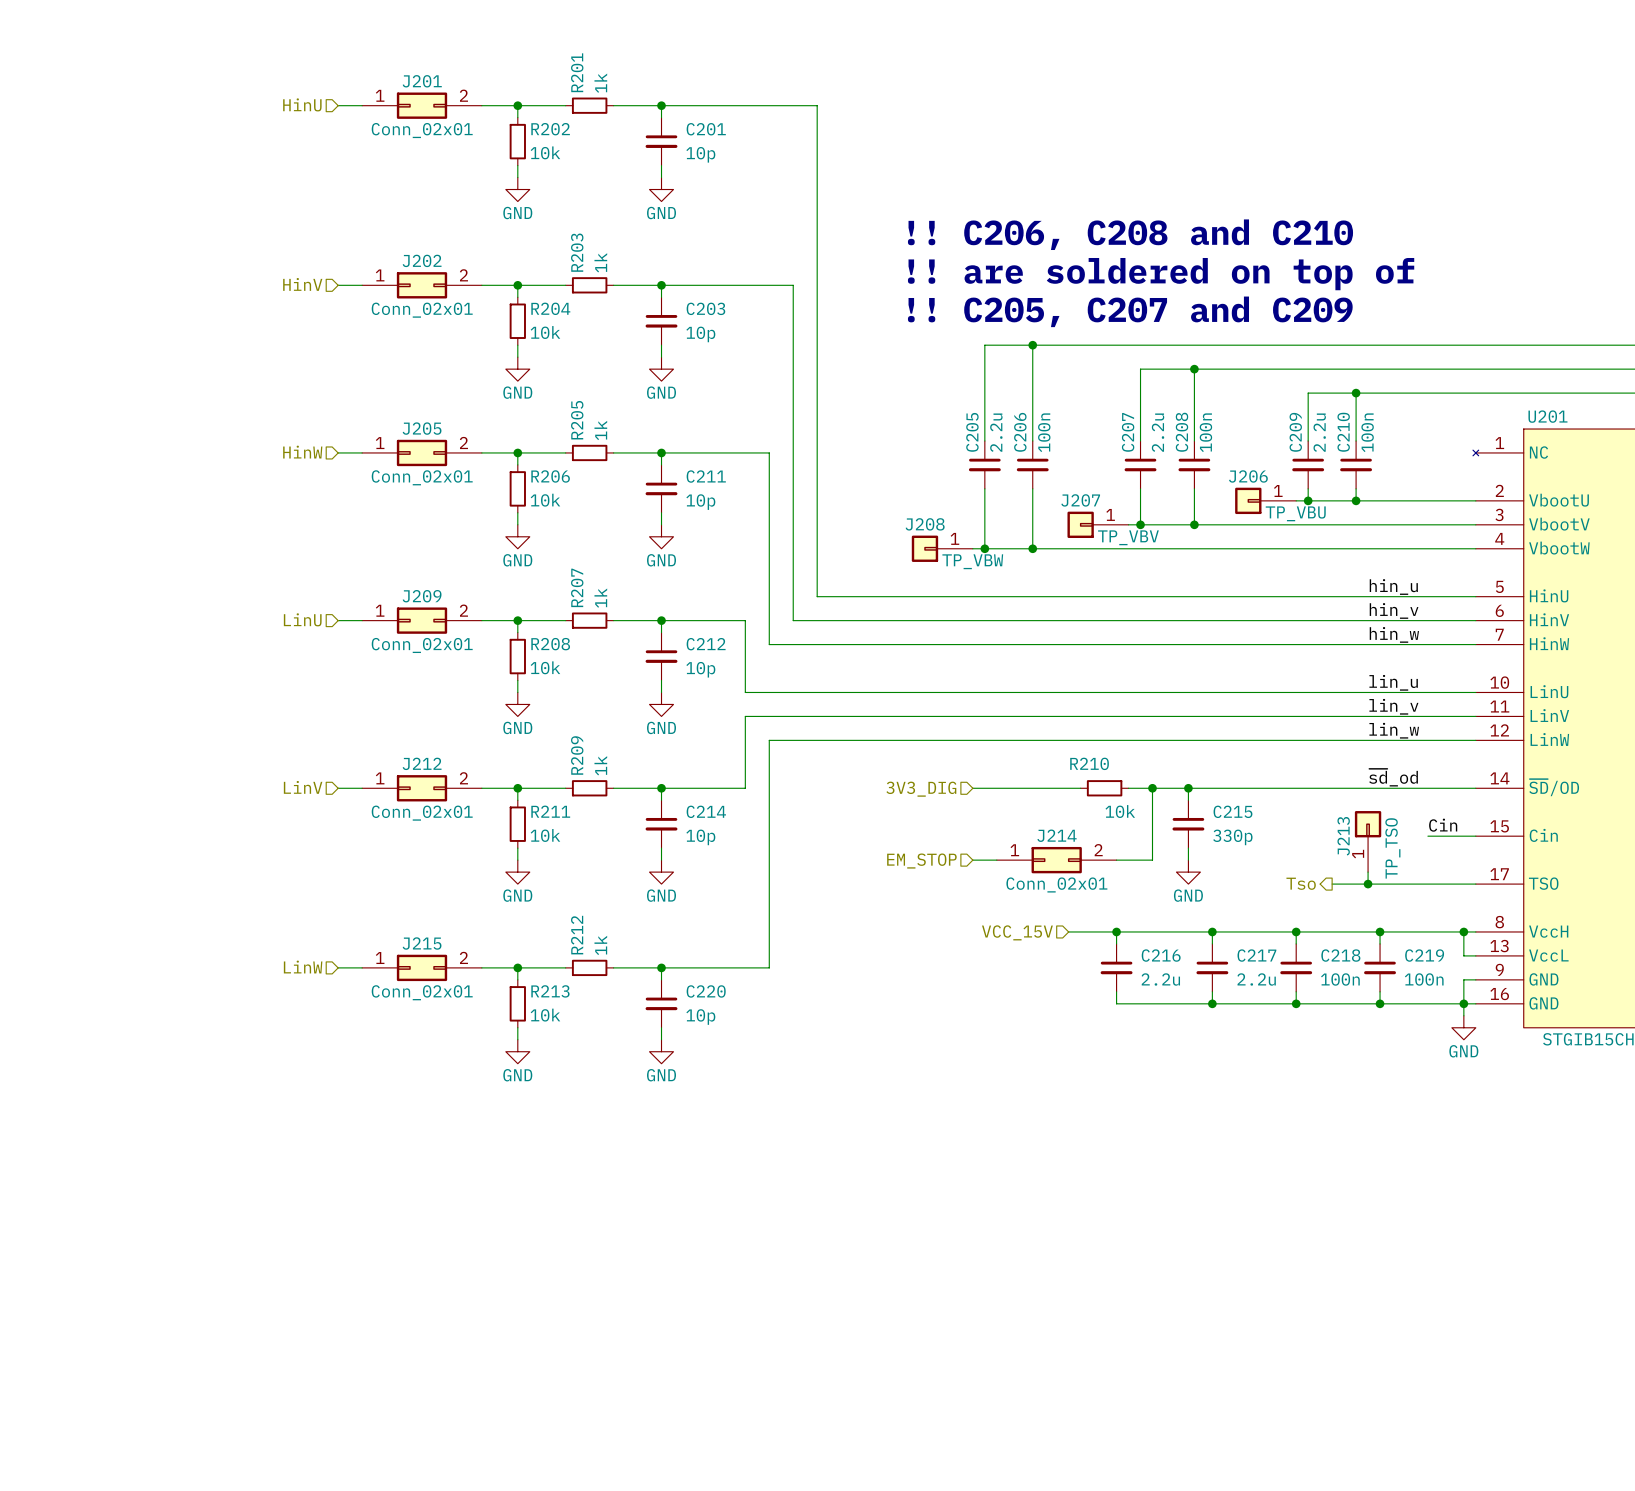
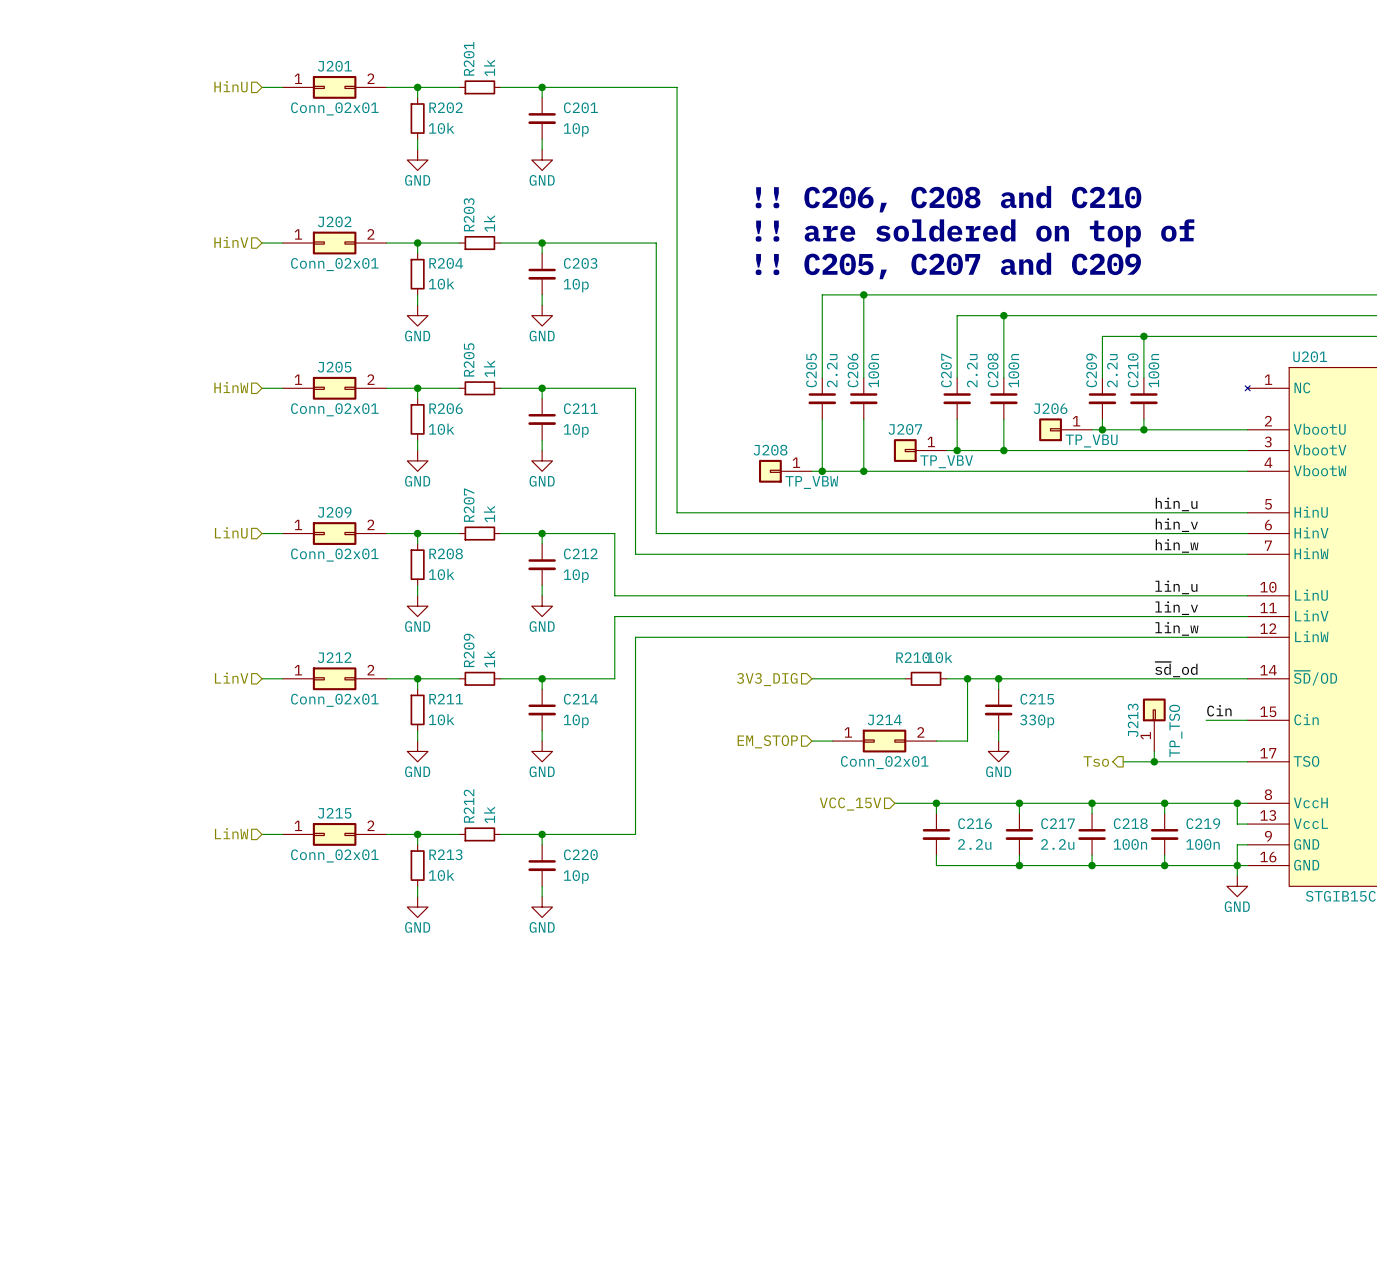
R210 value position: 10k (1120, 811) -> 10k (939, 657)

